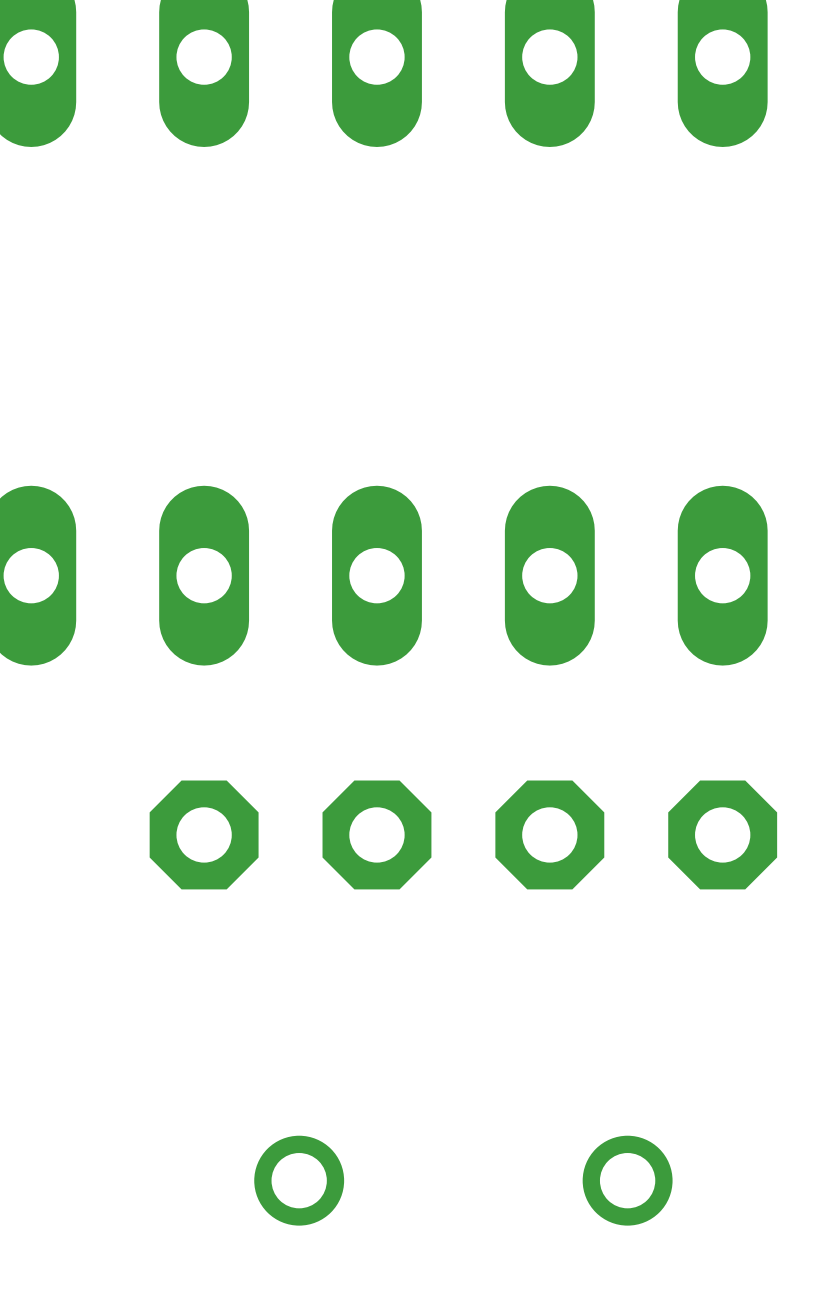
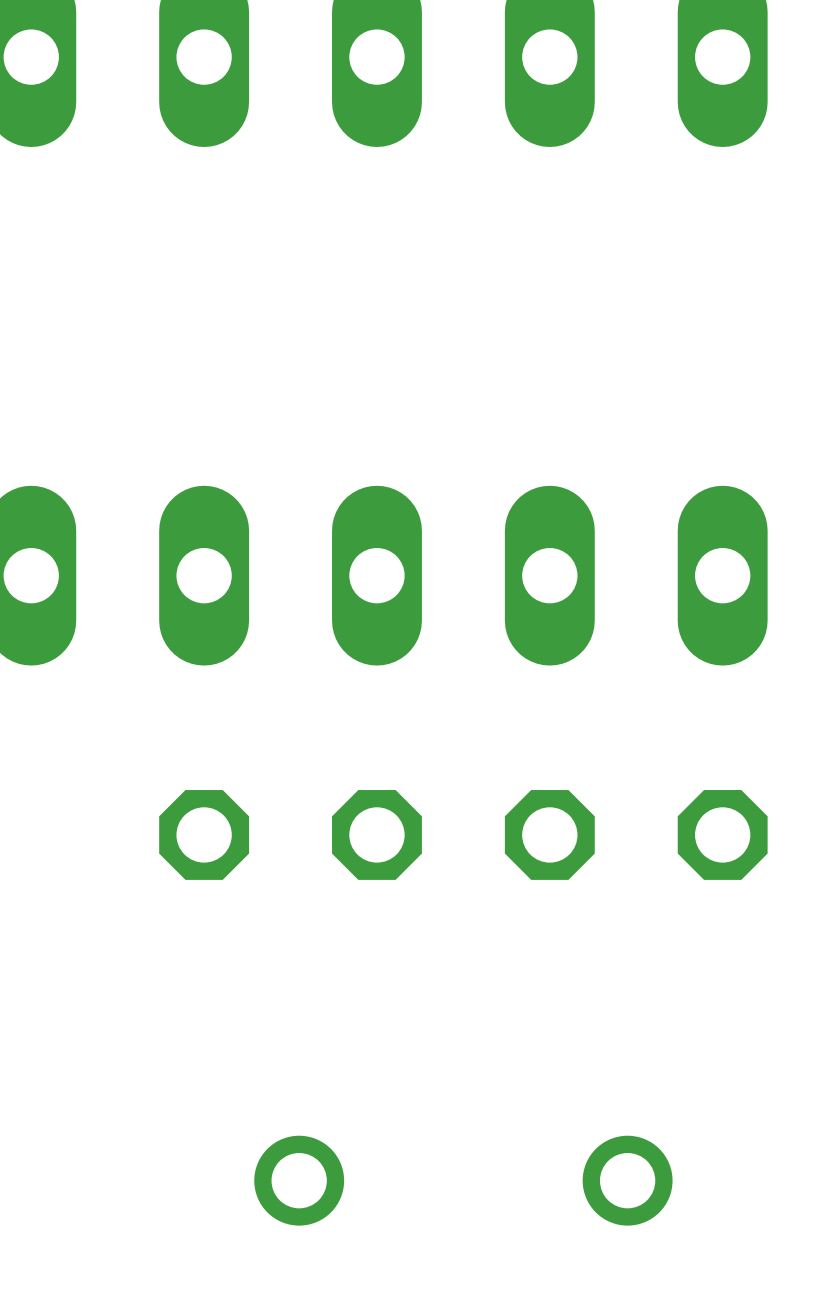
part footprint: [149, 780, 432, 890] -> [159, 790, 422, 880]
part footprint: [495, 780, 778, 890] -> [504, 790, 768, 880]

